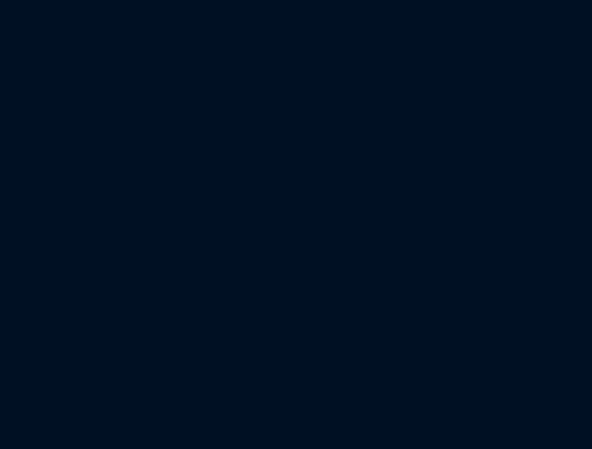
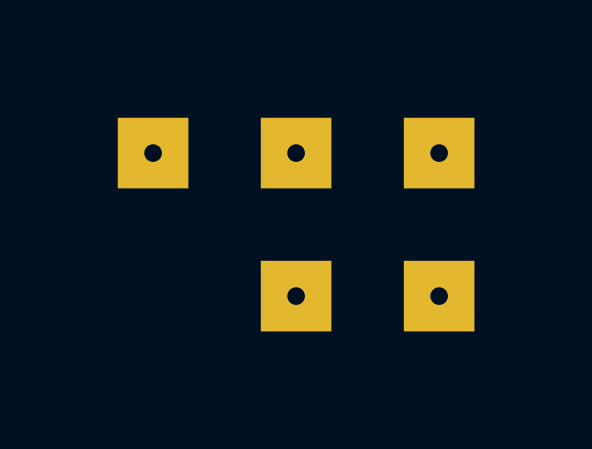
part: none -> (153, 153)
part: none -> (296, 153)
part: none -> (439, 153)
part: none -> (296, 296)
part: none -> (439, 296)

